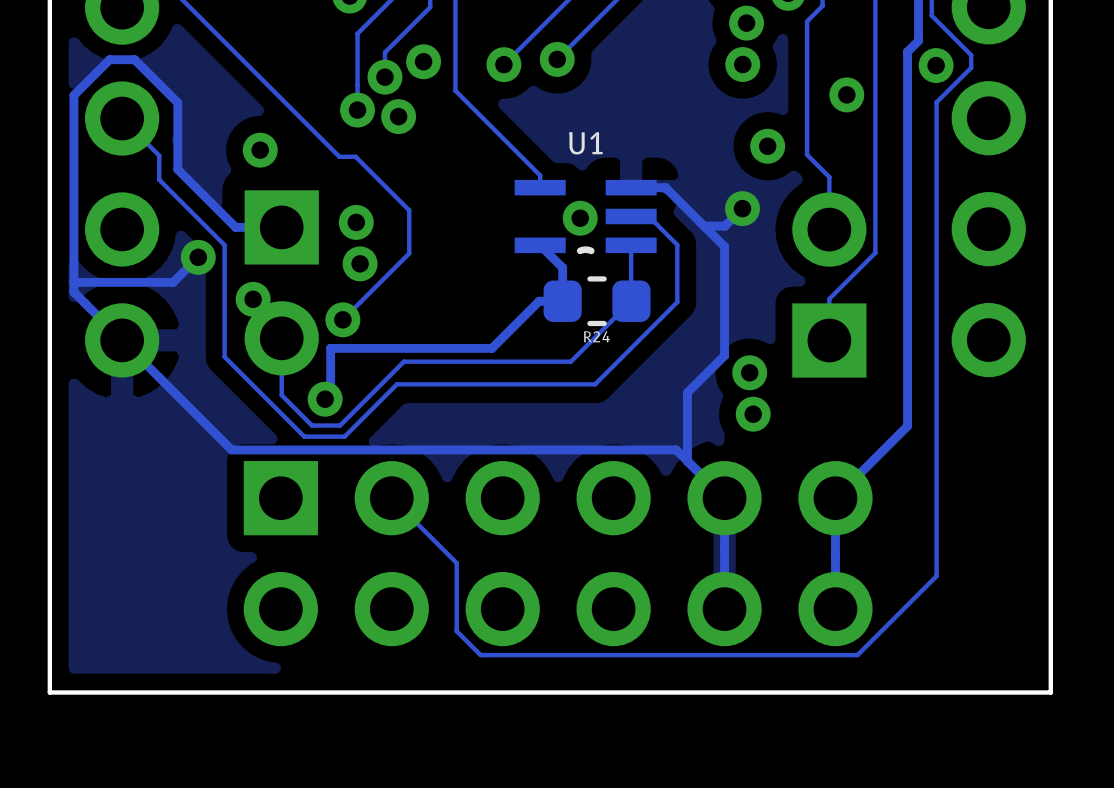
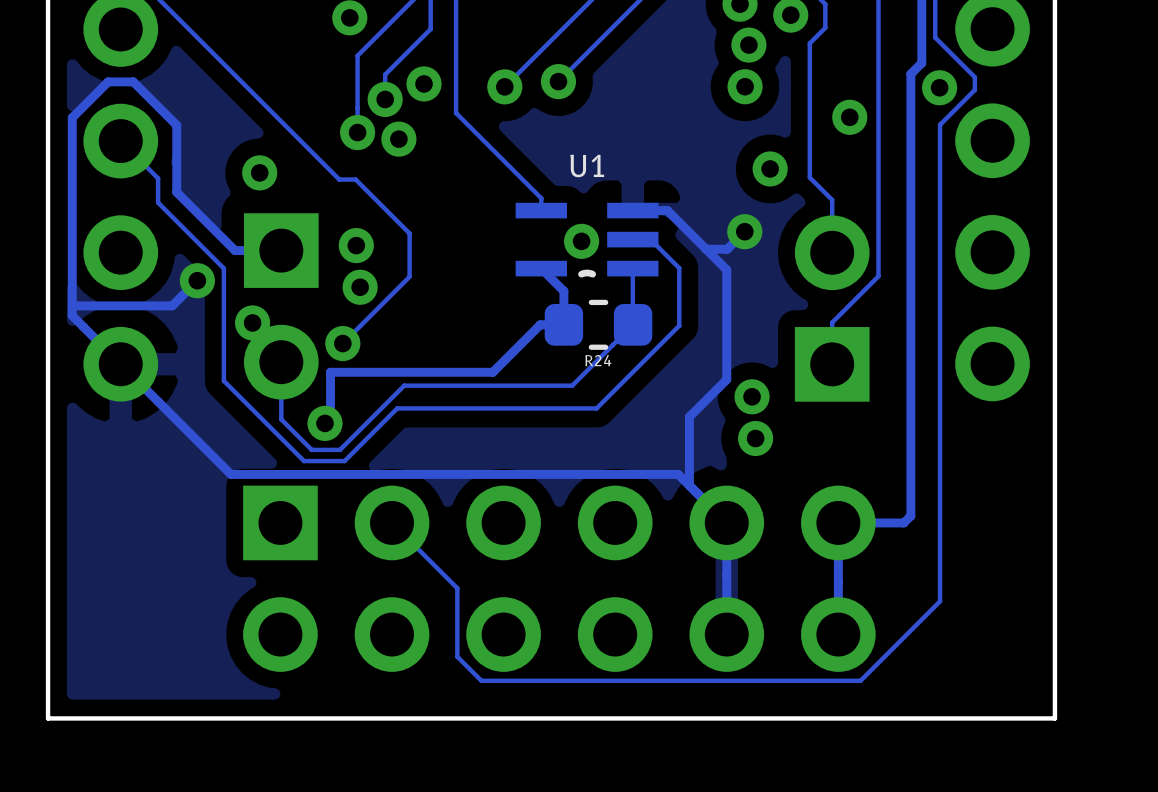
track: (907, 426) (835, 498) -> (910, 450) (910, 515) (903, 522) (838, 522)

